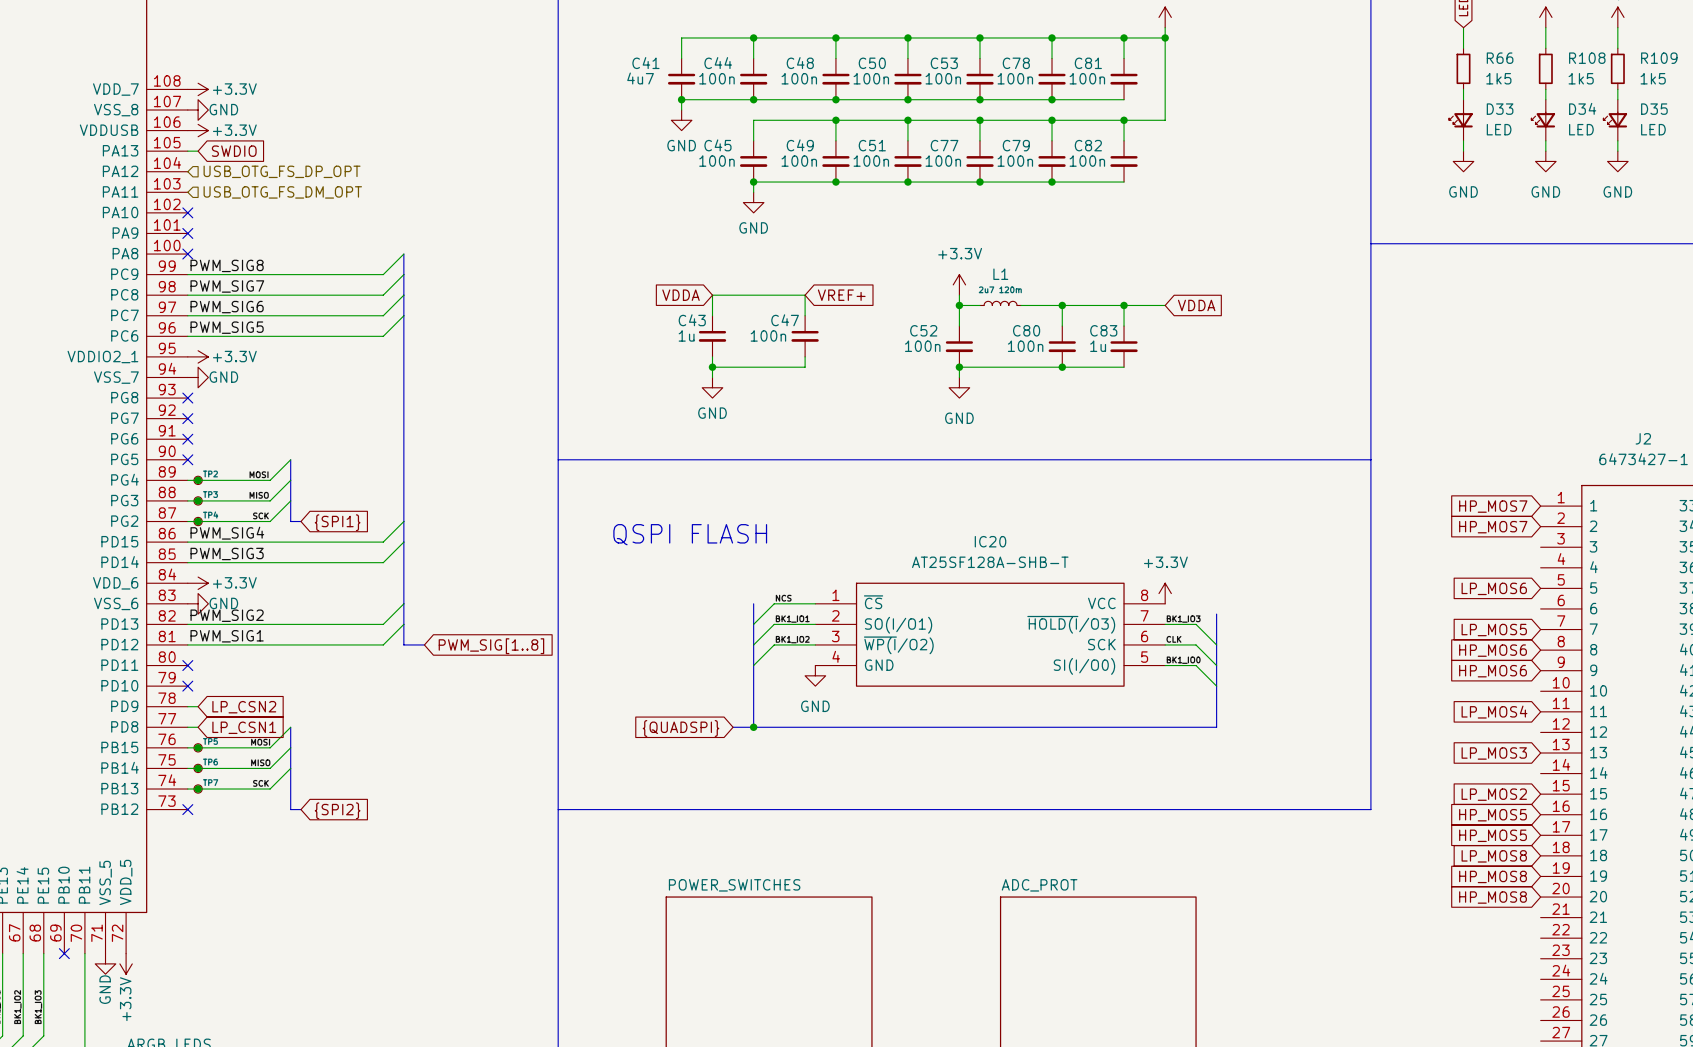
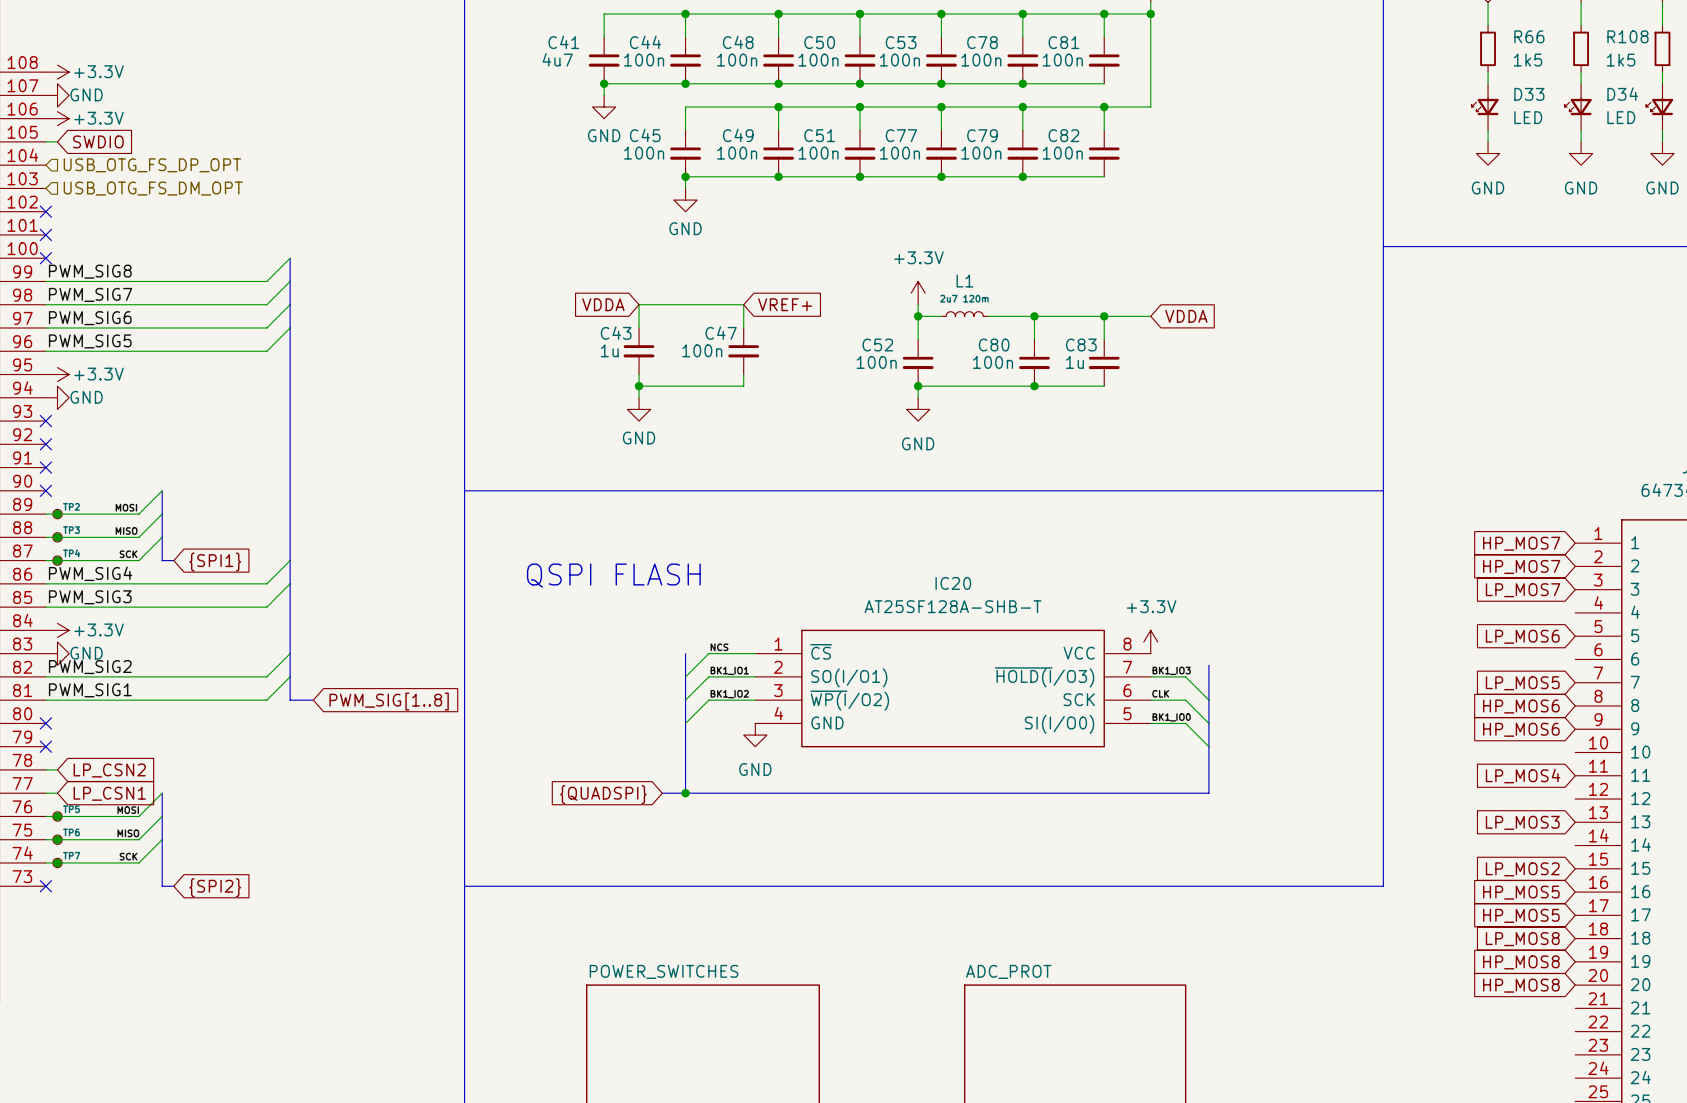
global label: none -> LP_MOS7 (1523, 590)

